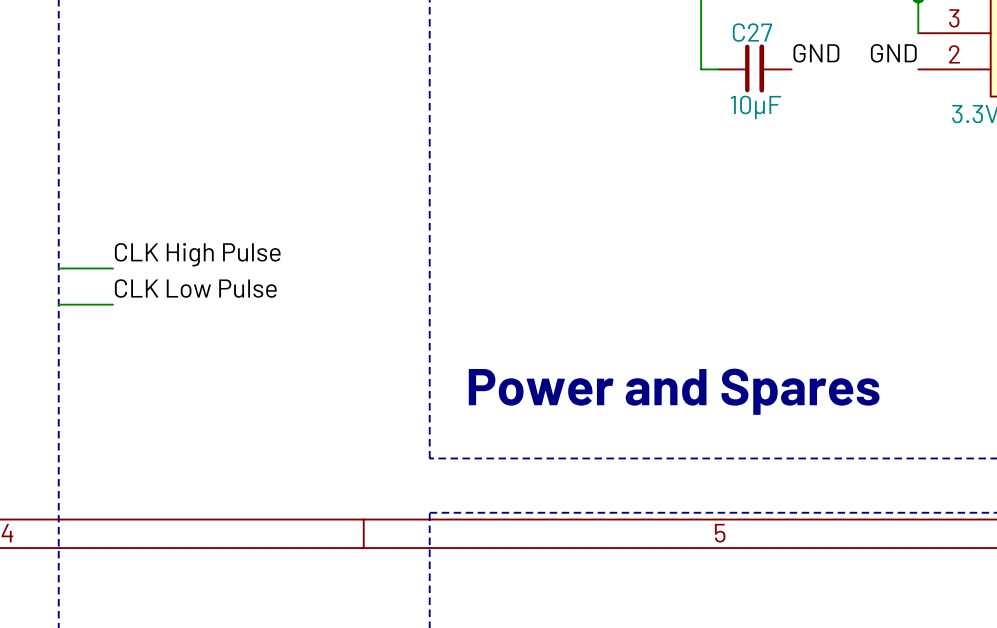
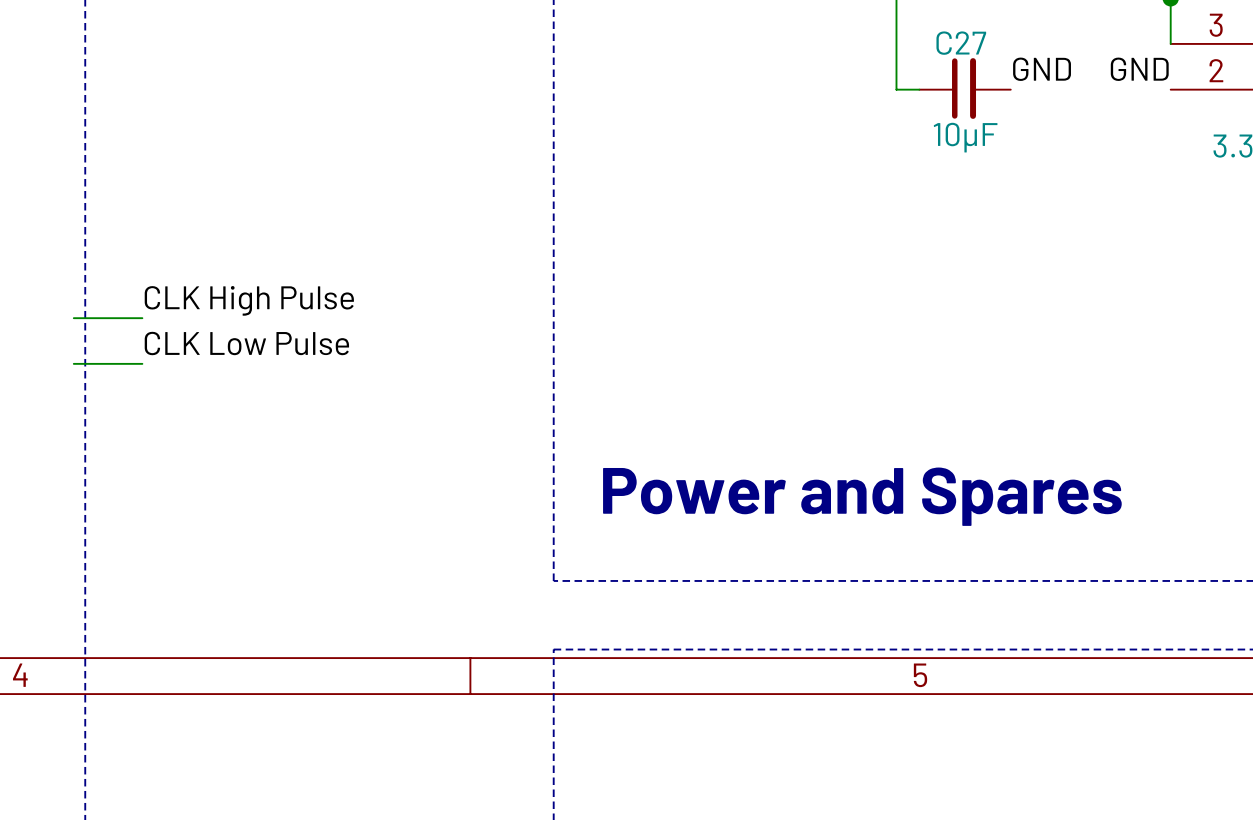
label position: CLK High Pulse (197, 254) -> CLK High Pulse (249, 300)
wire: (58, 268) (113, 268) -> (73, 318) (142, 318)
label position: CLK Low Pulse (195, 288) -> CLK Low Pulse (246, 343)
wire: (58, 304) (113, 304) -> (73, 363) (142, 363)

